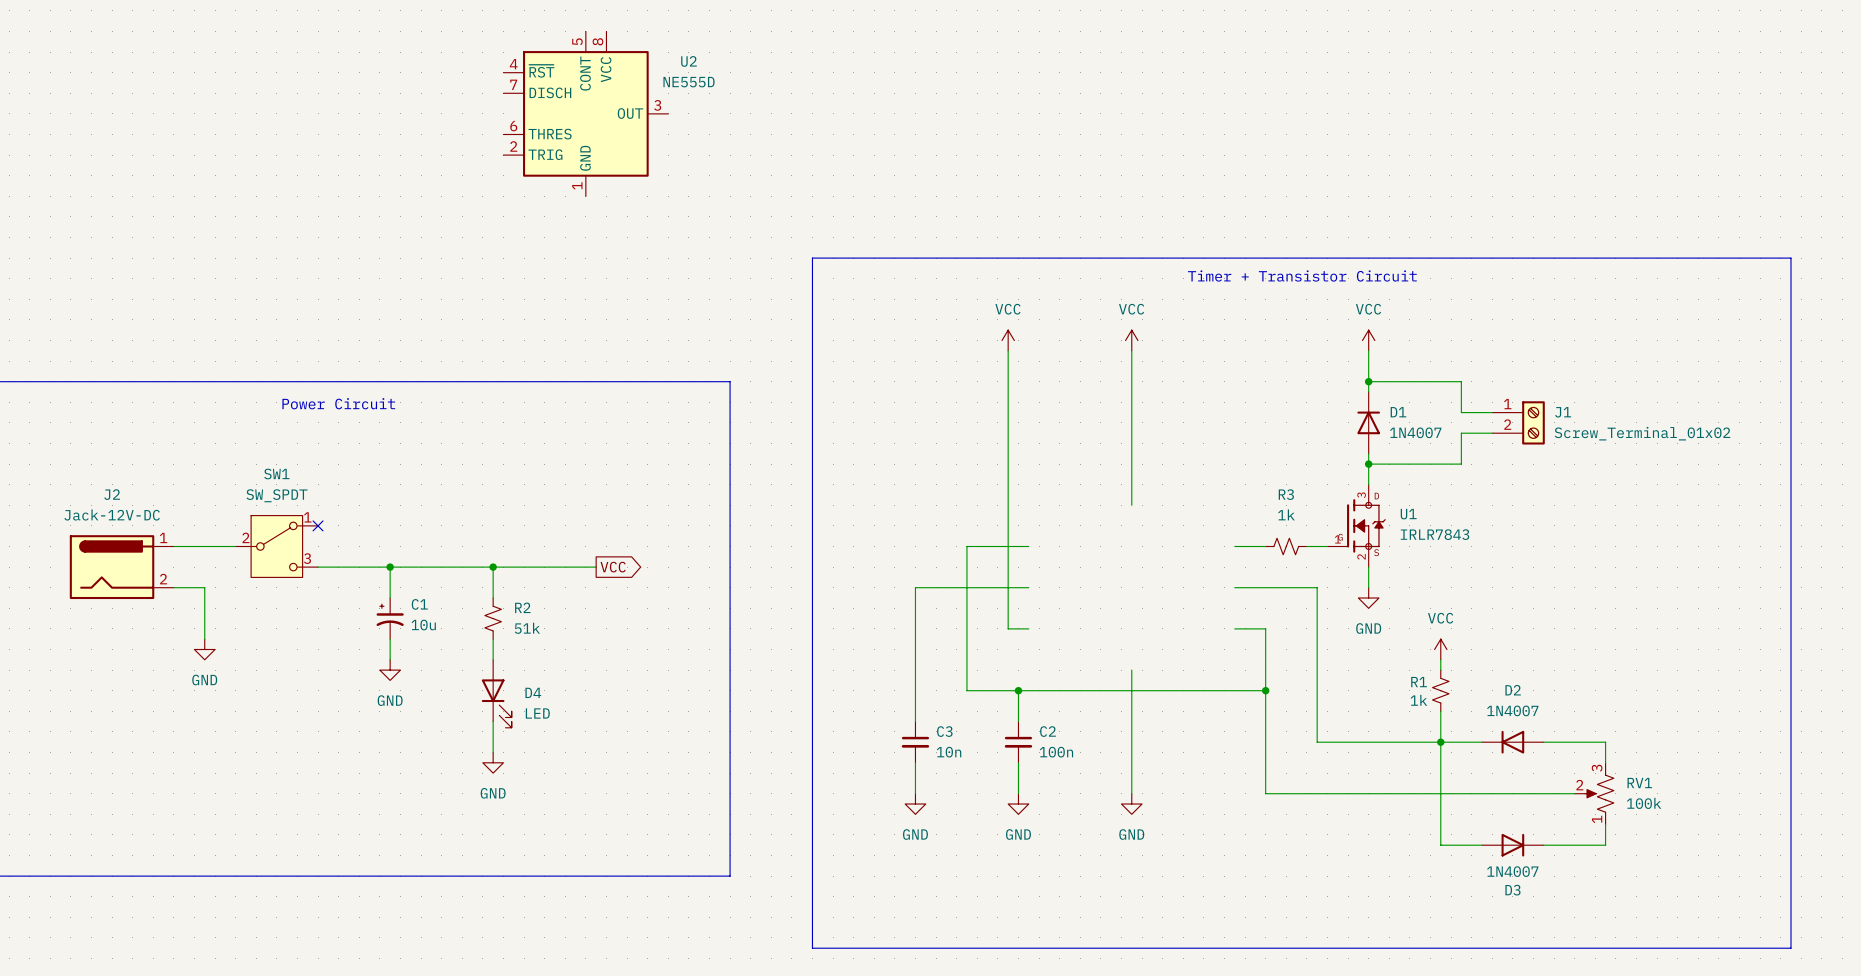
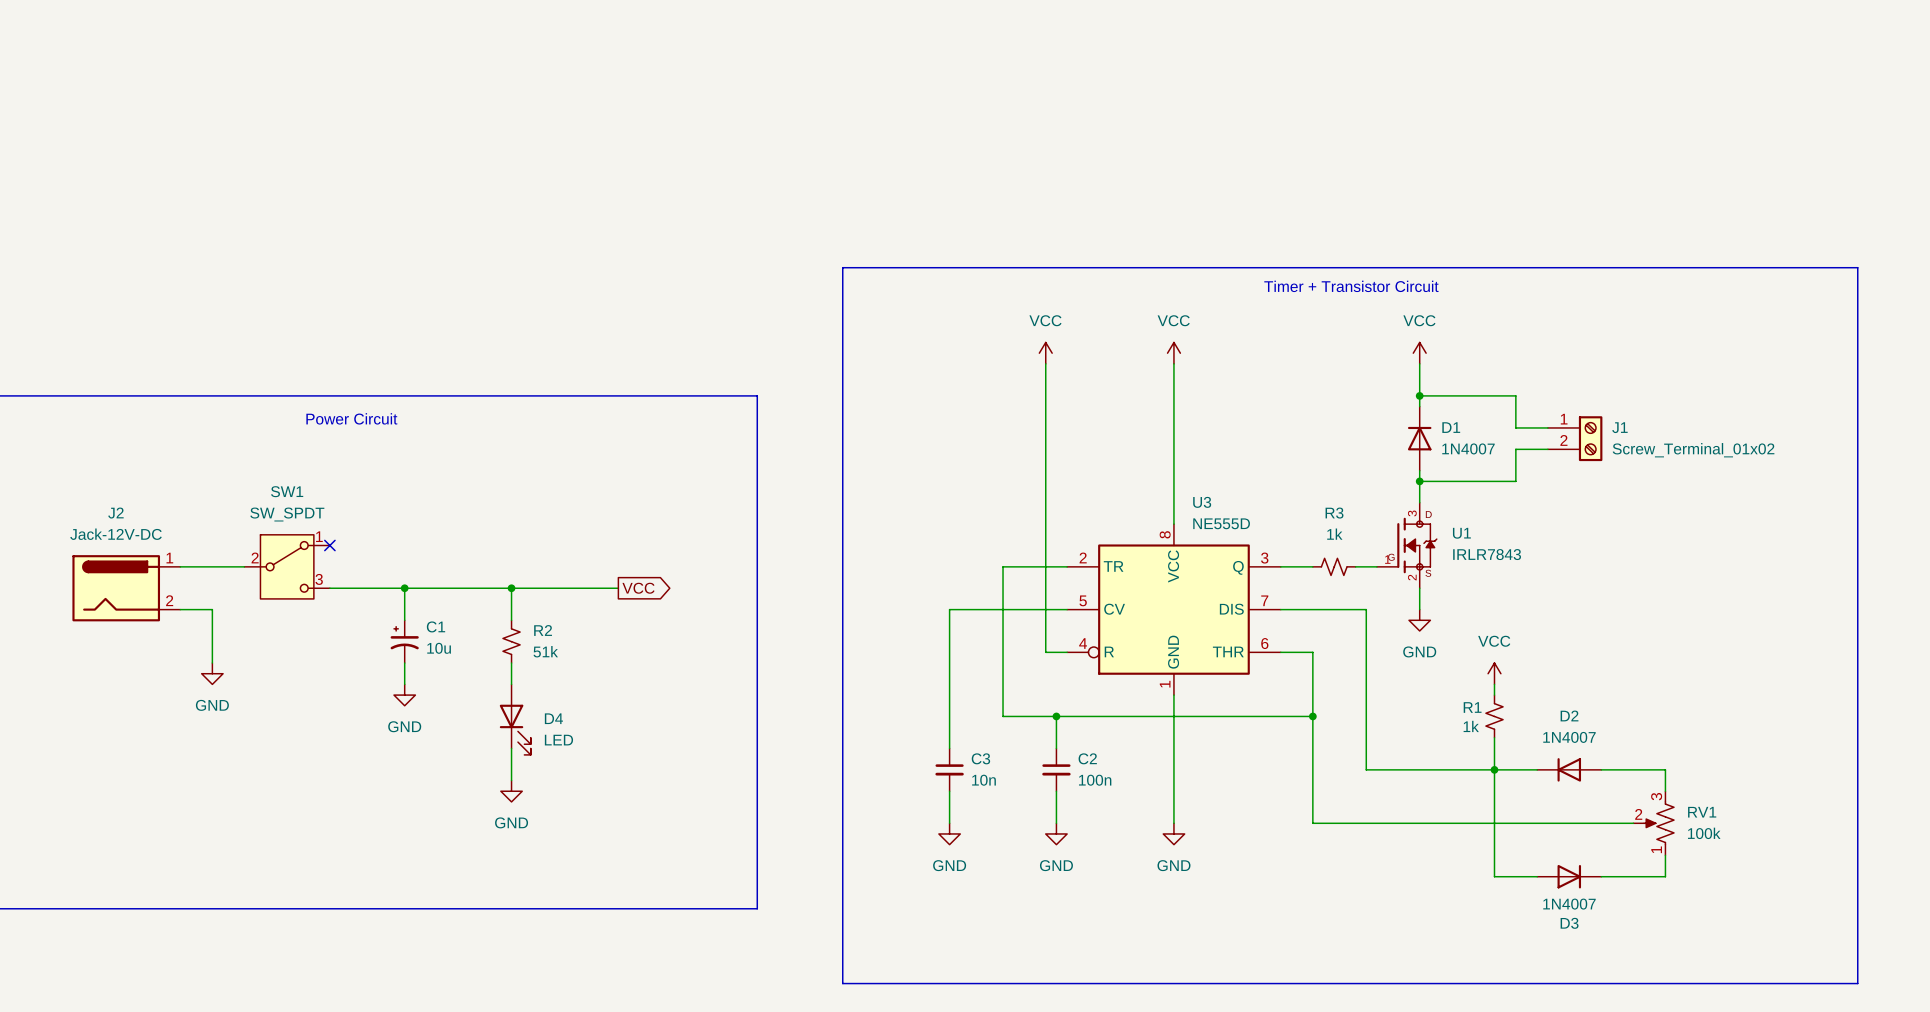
U2: NE555D (585, 113) -> none
U3: none -> NE555D (1173, 609)

